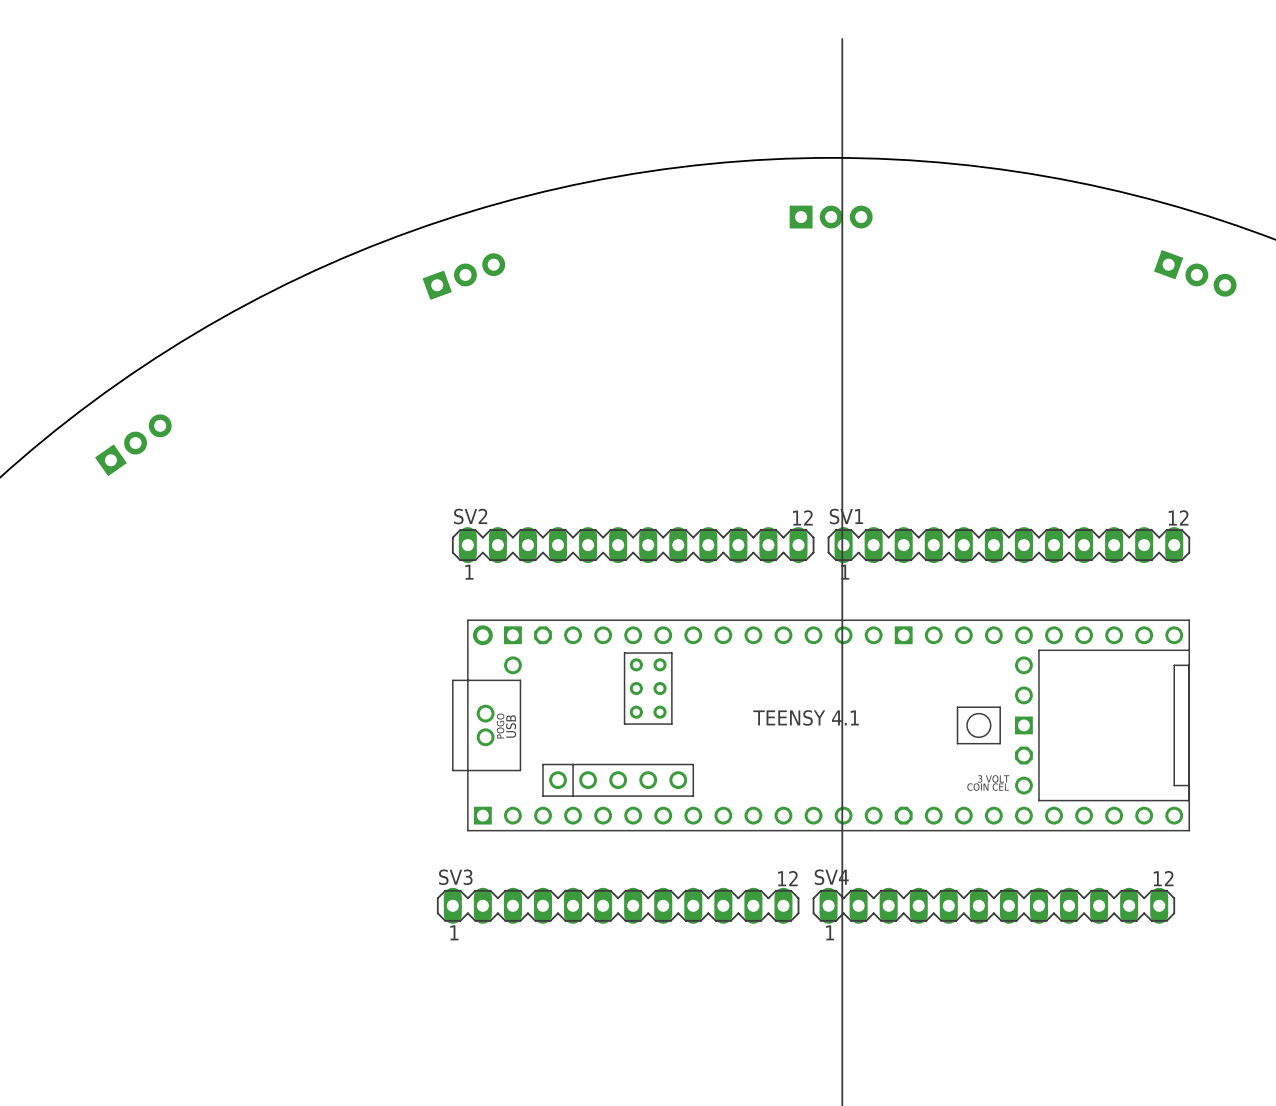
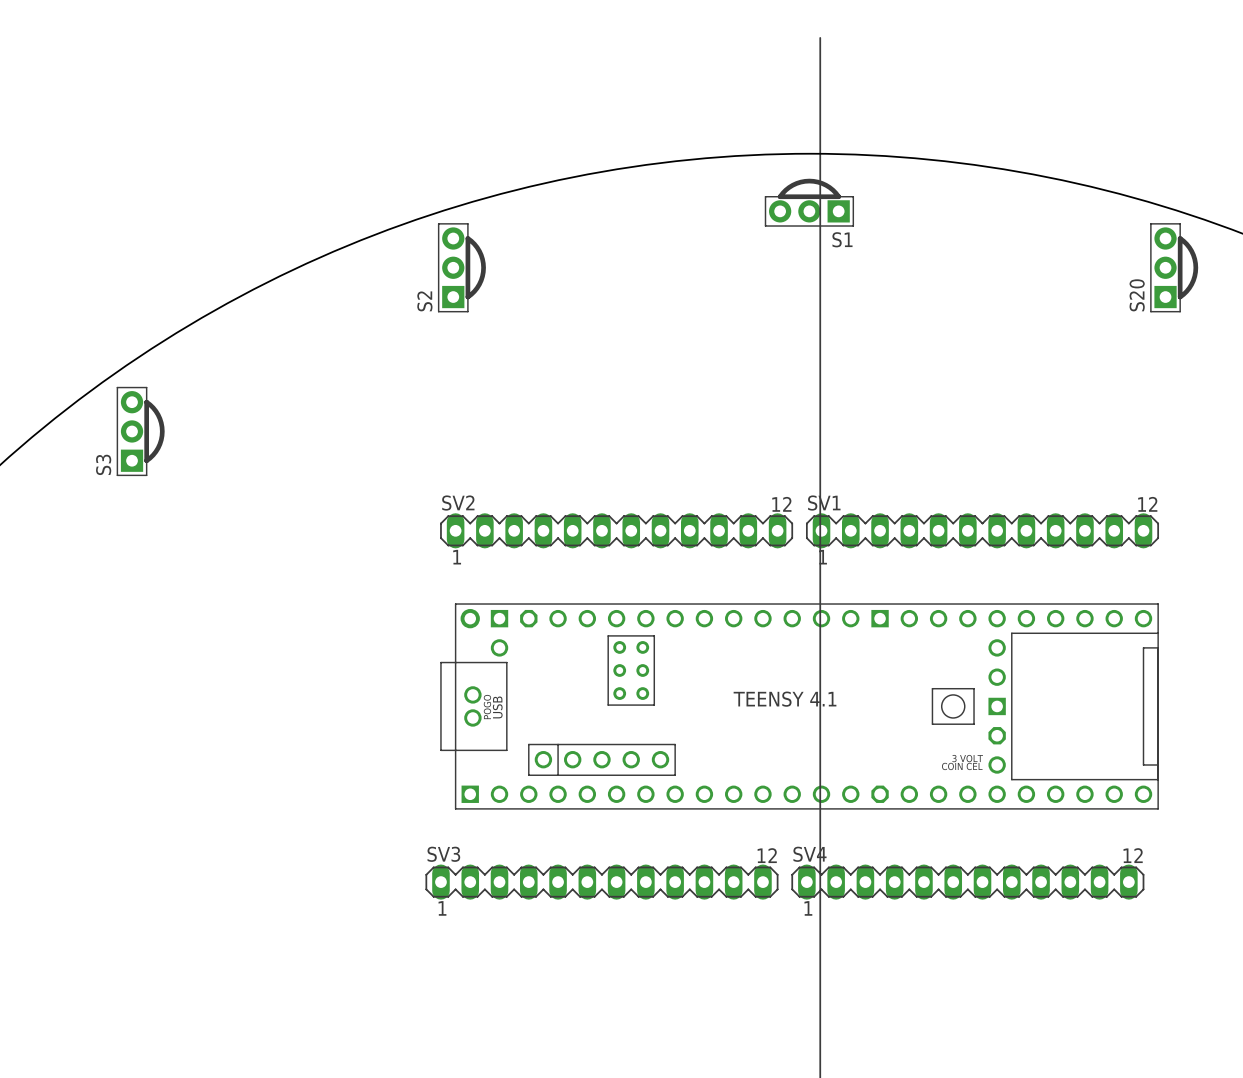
S1 side: bottom (831, 217) -> top (809, 202)
S20 side: bottom (1195, 273) -> top (1174, 267)
S2 side: bottom (463, 276) -> top (461, 267)
S3 side: bottom (133, 445) -> top (140, 431)

